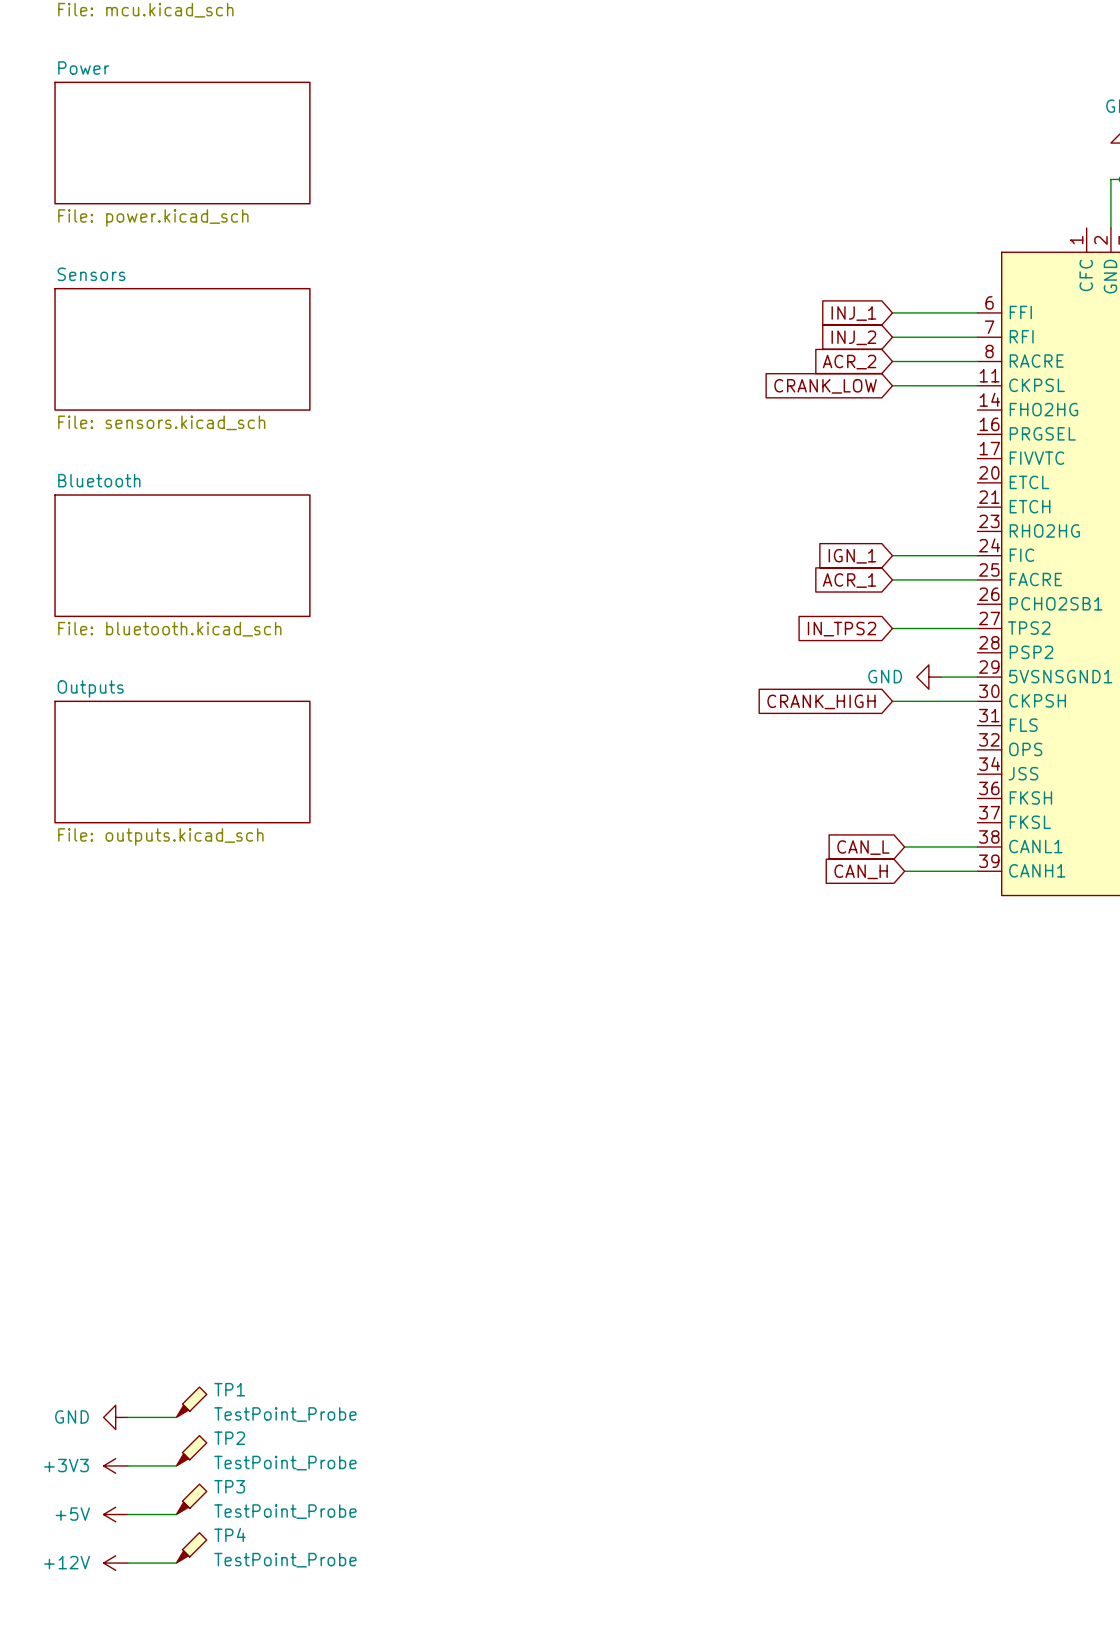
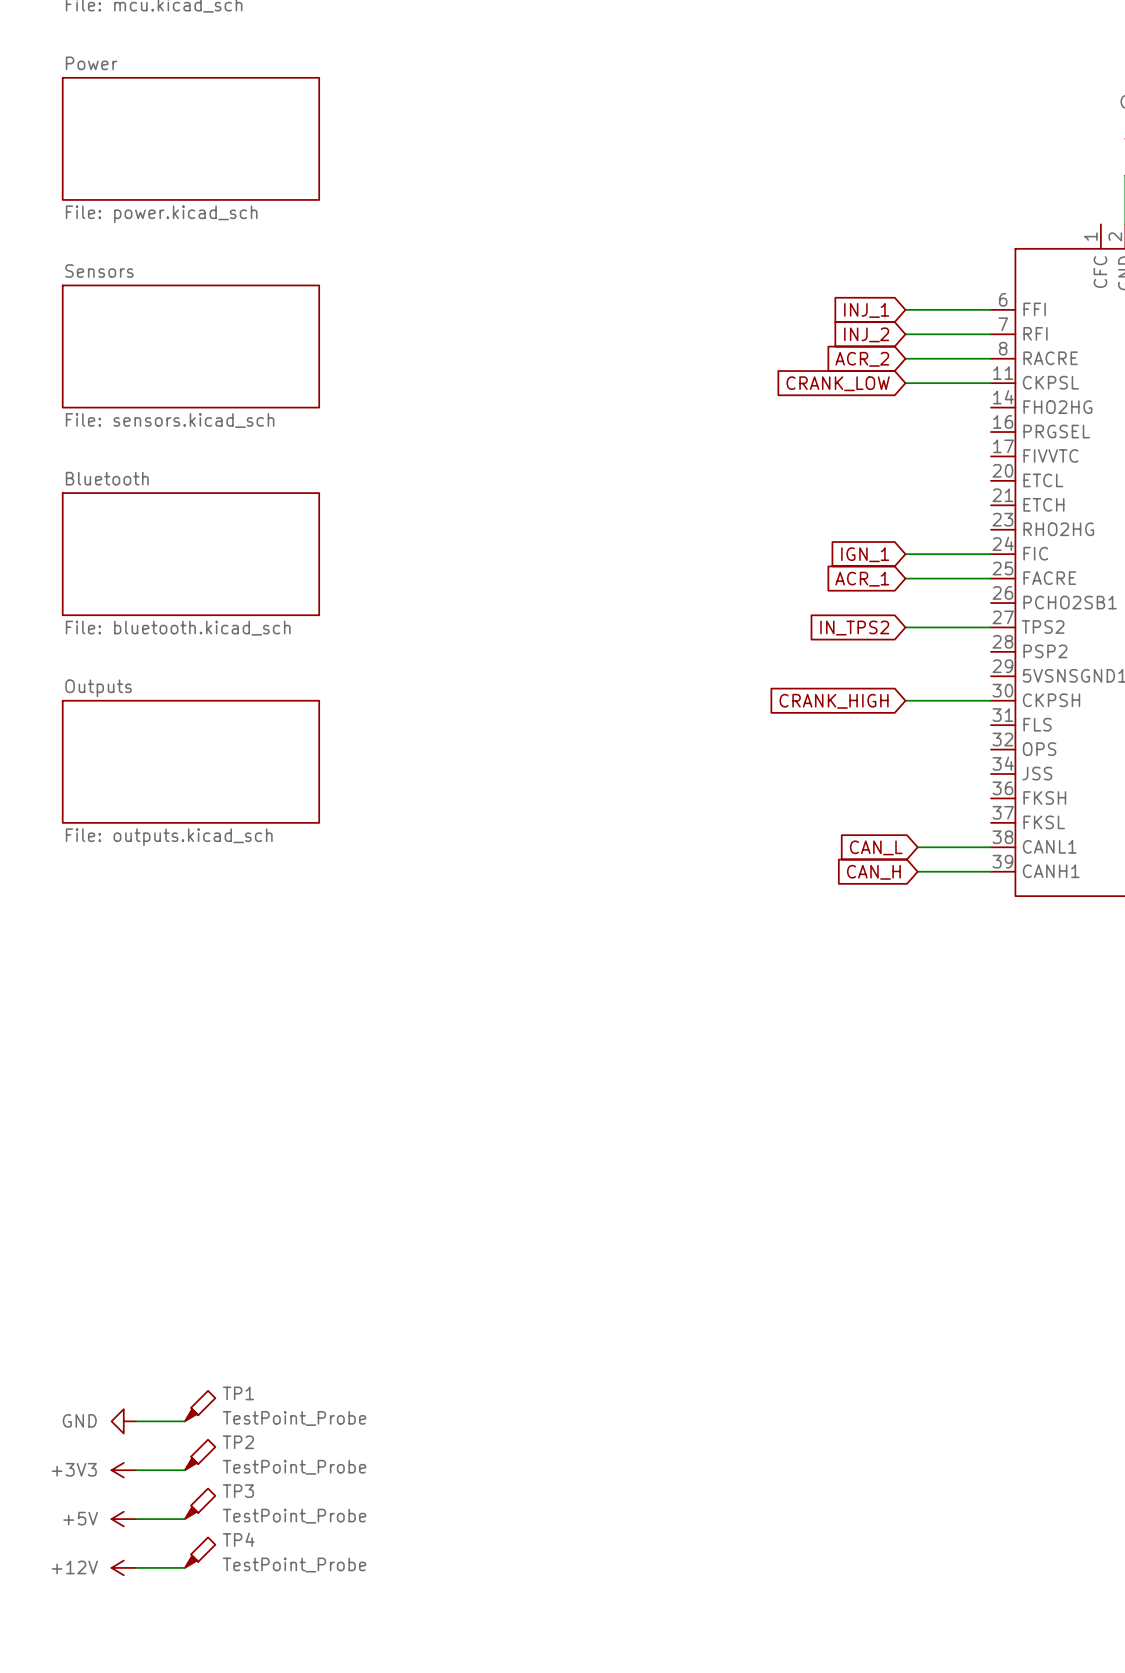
power symbol: GND (928, 677) -> none
wire: (941, 677) (977, 677) -> none

